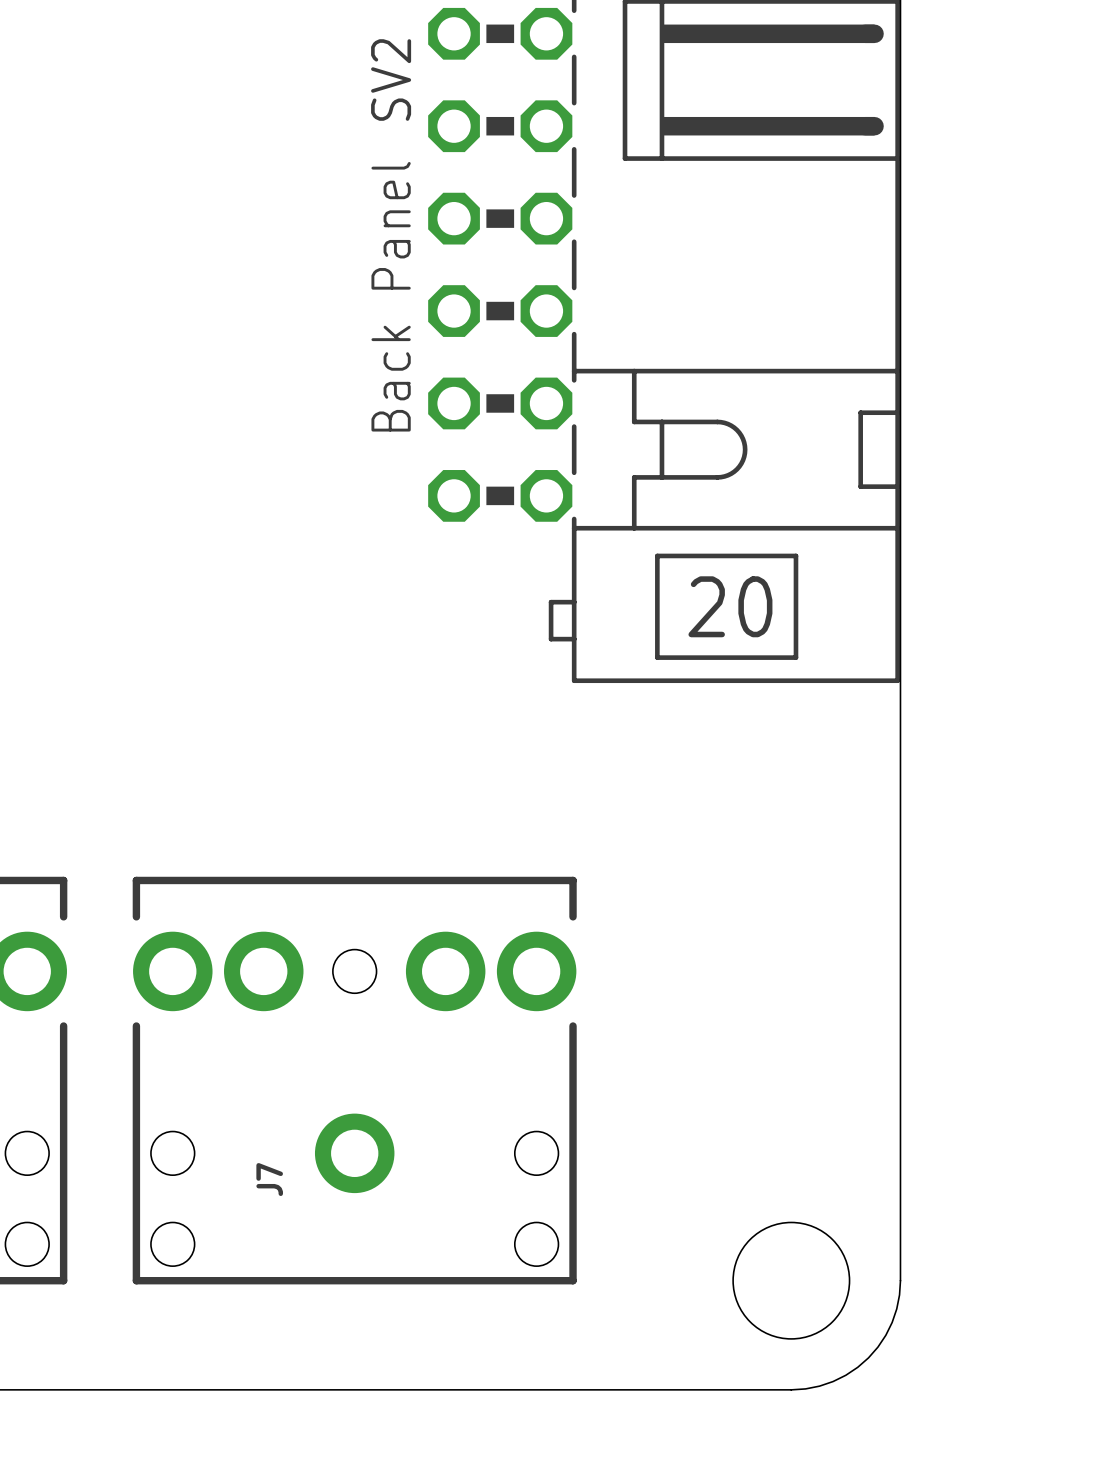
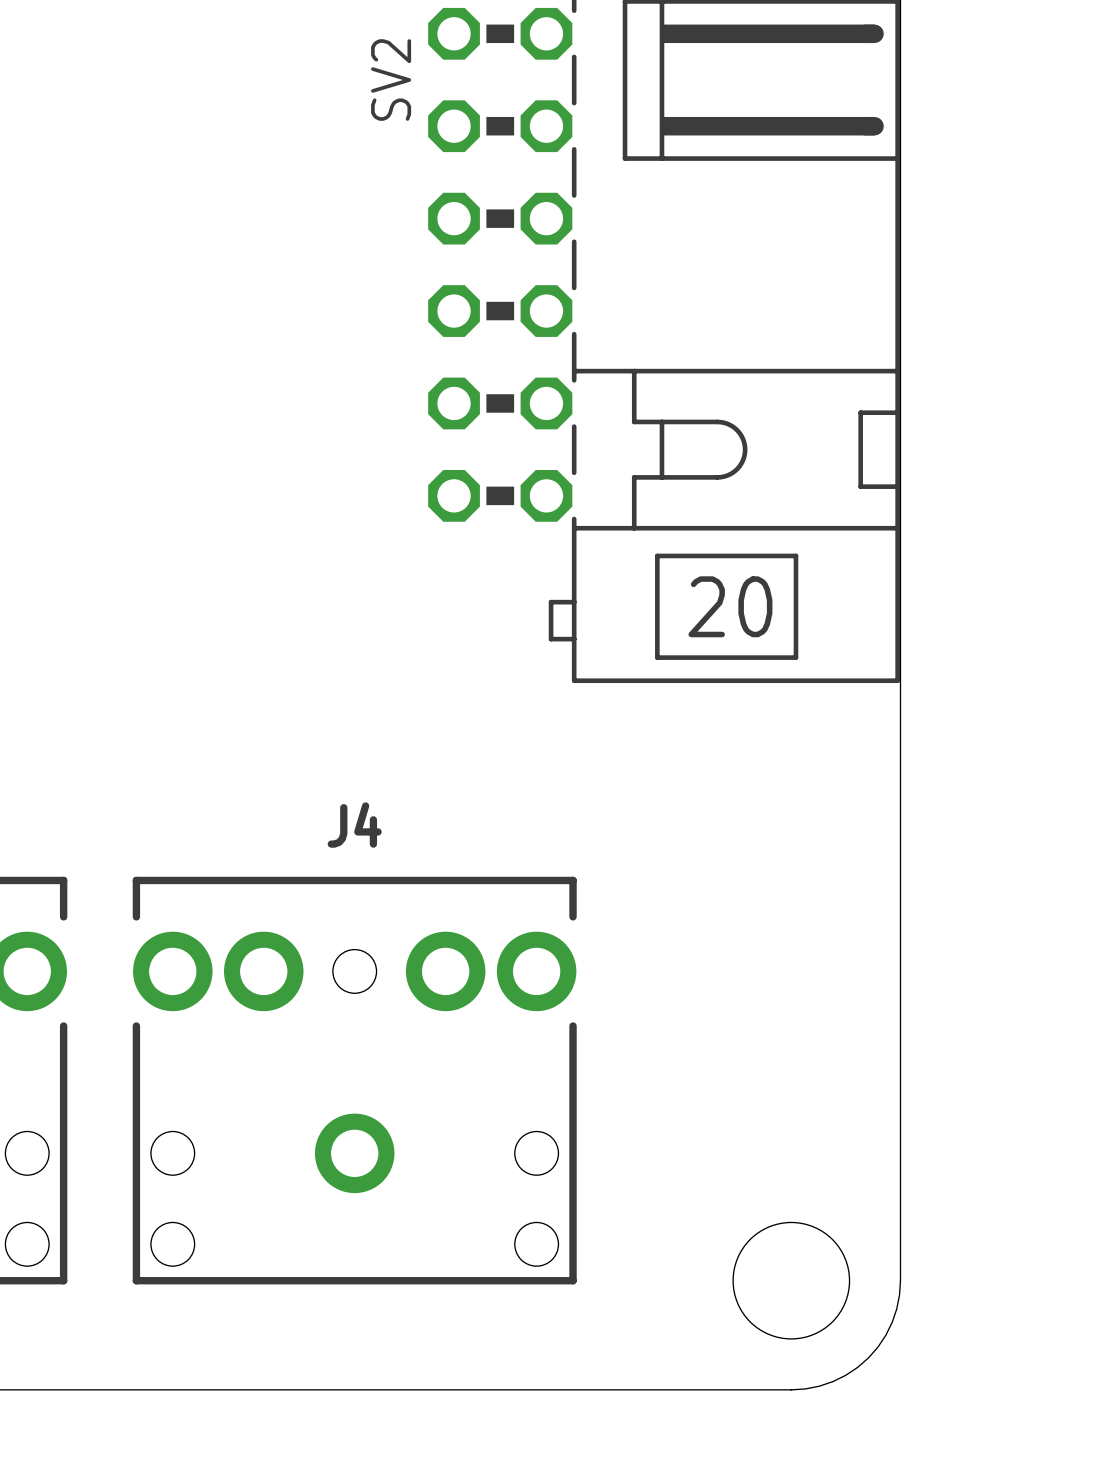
text: Back Panel (391, 296) -> none
J7 name: J7 (269, 1179) -> J4 (354, 825)

